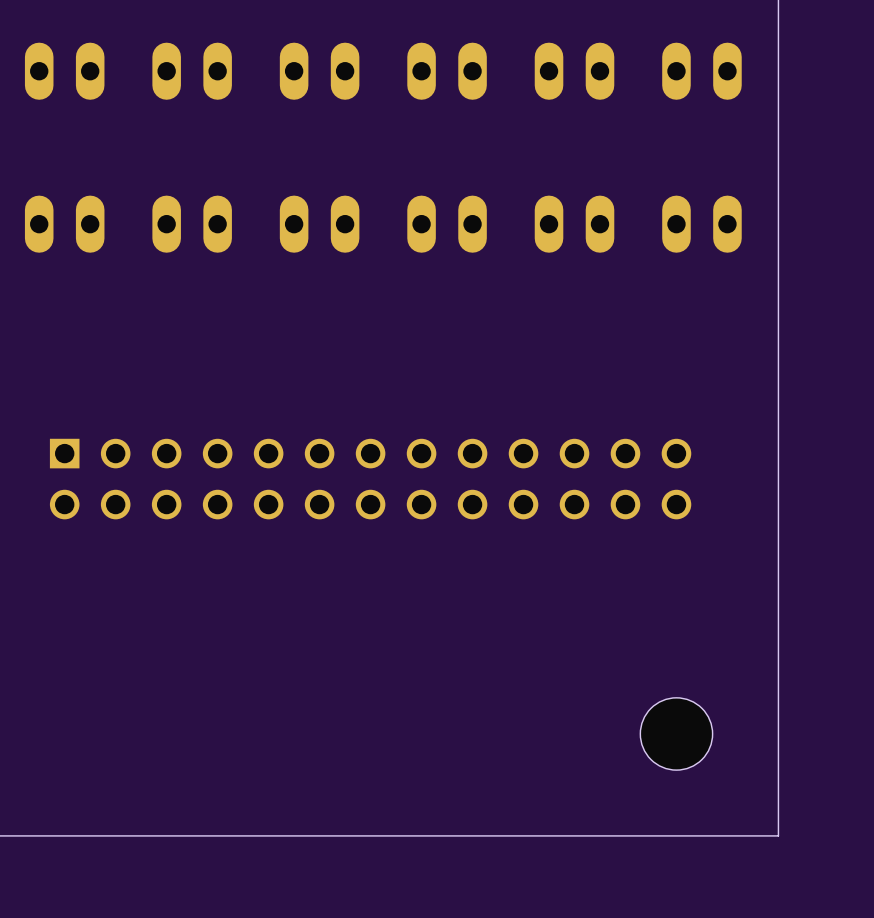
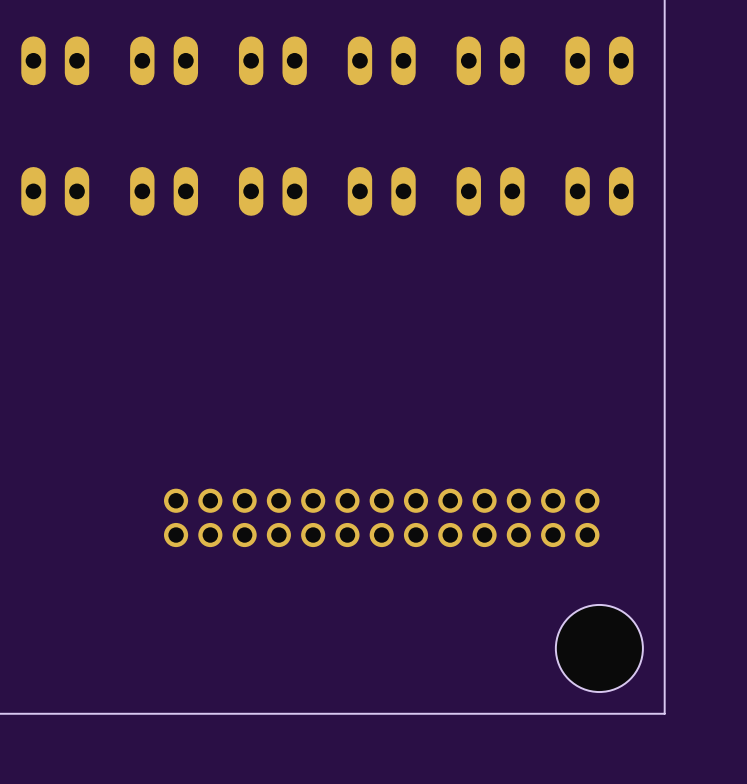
part: (370, 479) -> none
part: none -> (381, 517)
part: (676, 733) -> none
hole: none -> (599, 648)

